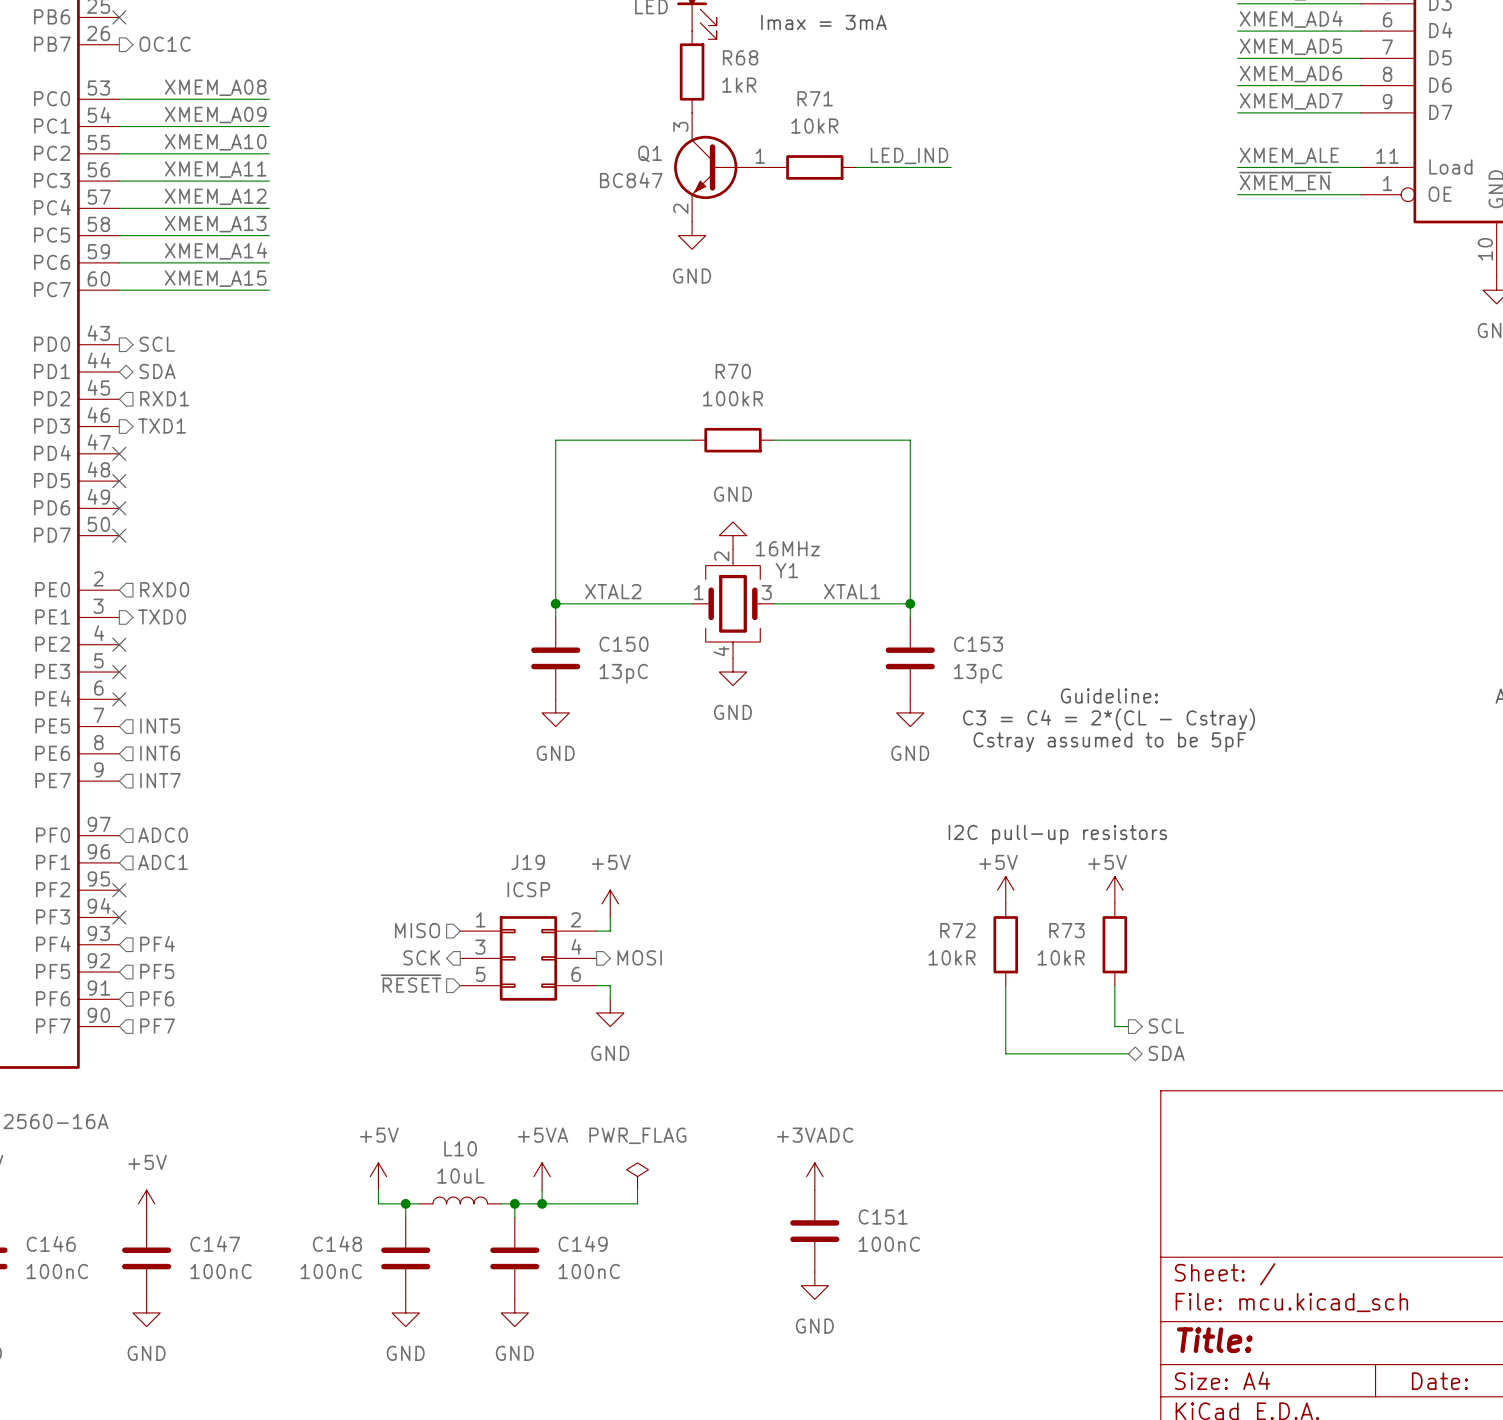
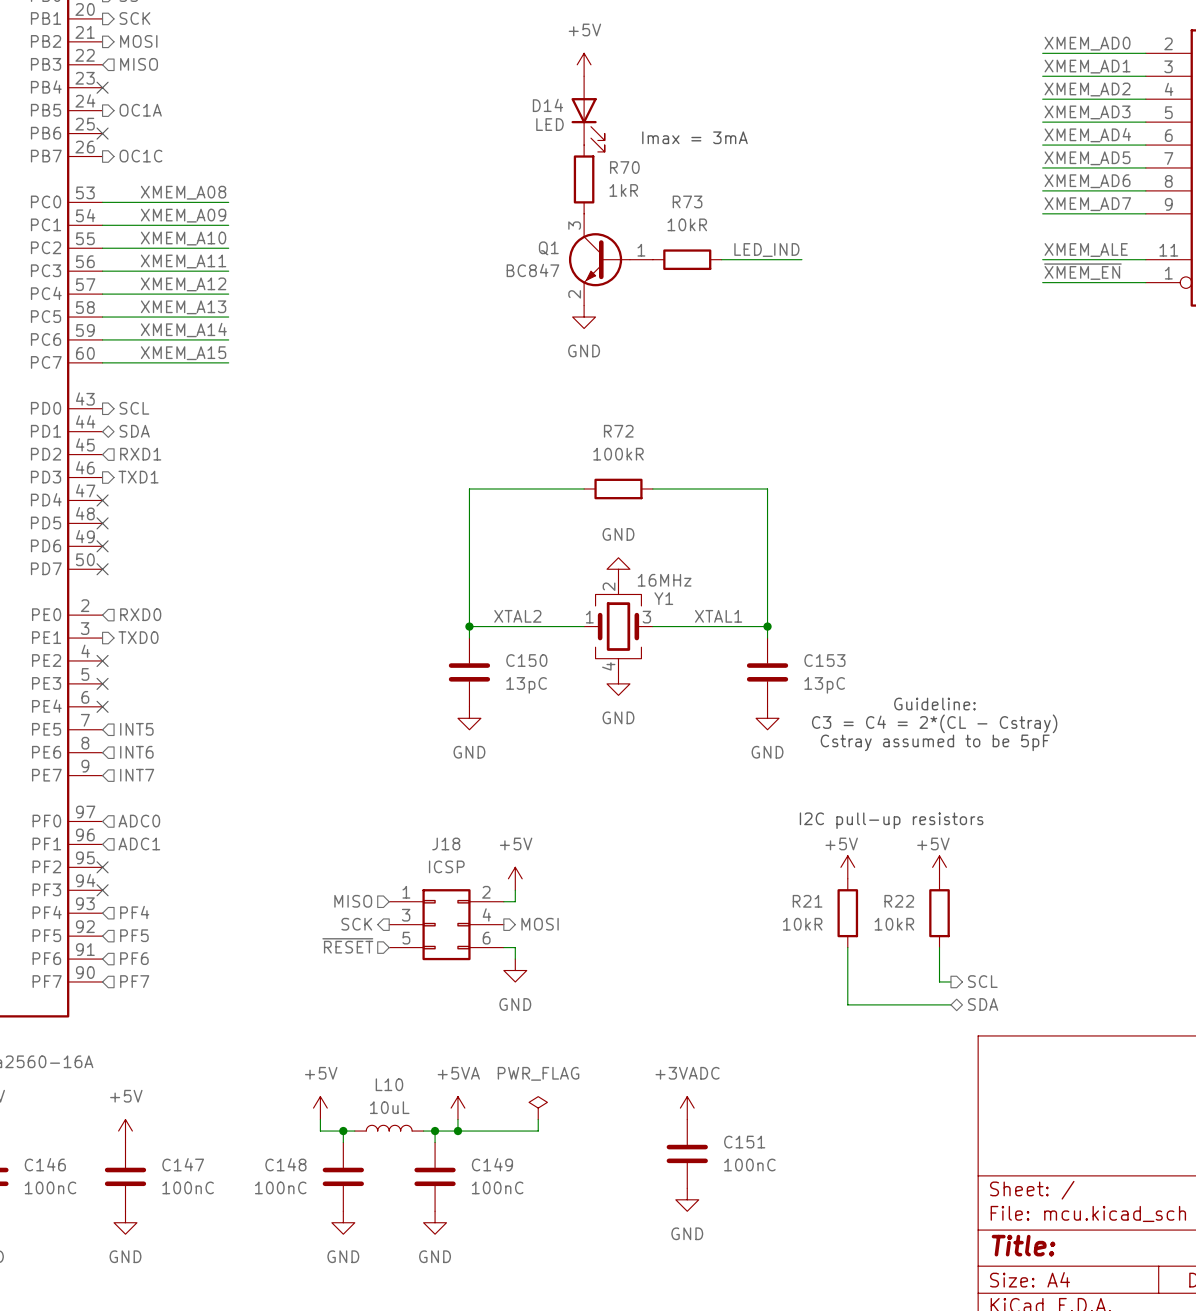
R68 name: R68 (740, 57) -> R70 (624, 167)
R71 name: R71 (815, 98) -> R73 (687, 201)
R70 name: R70 (733, 371) -> R72 (618, 431)
J19 name: J19 (528, 862) -> J18 (446, 843)
R72 name: R72 (957, 930) -> R21 (807, 901)
R73 name: R73 (1067, 930) -> R22 (899, 901)

